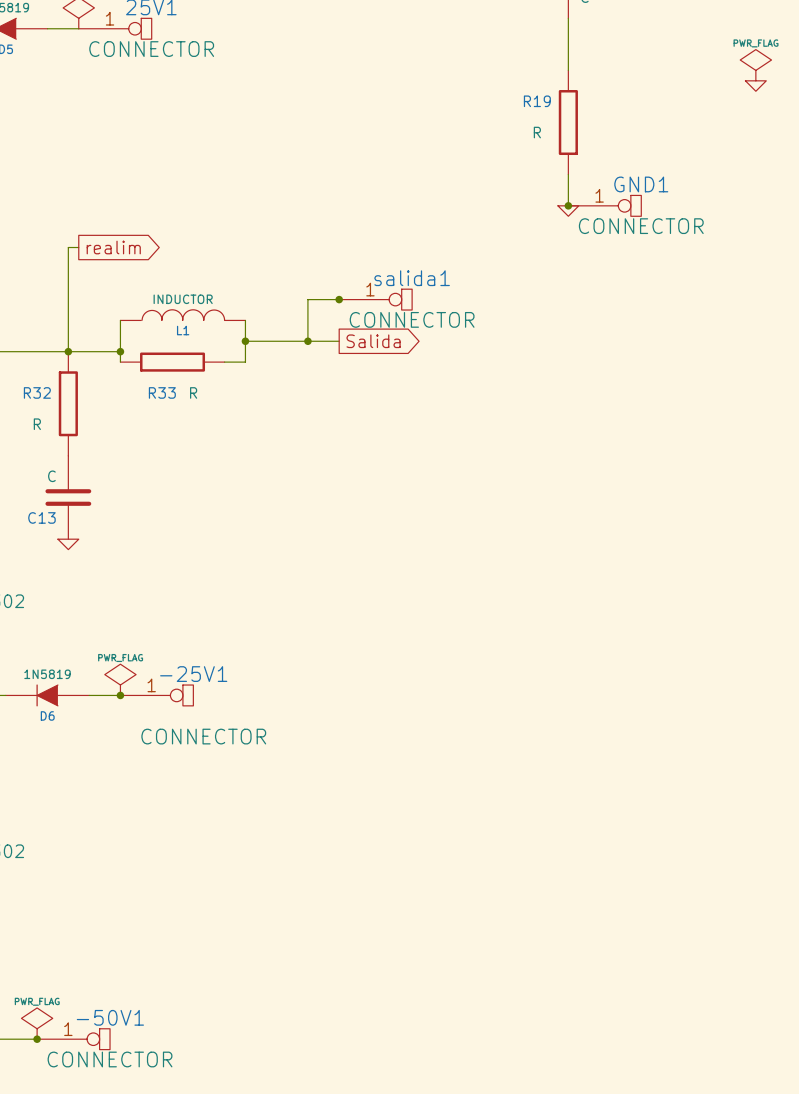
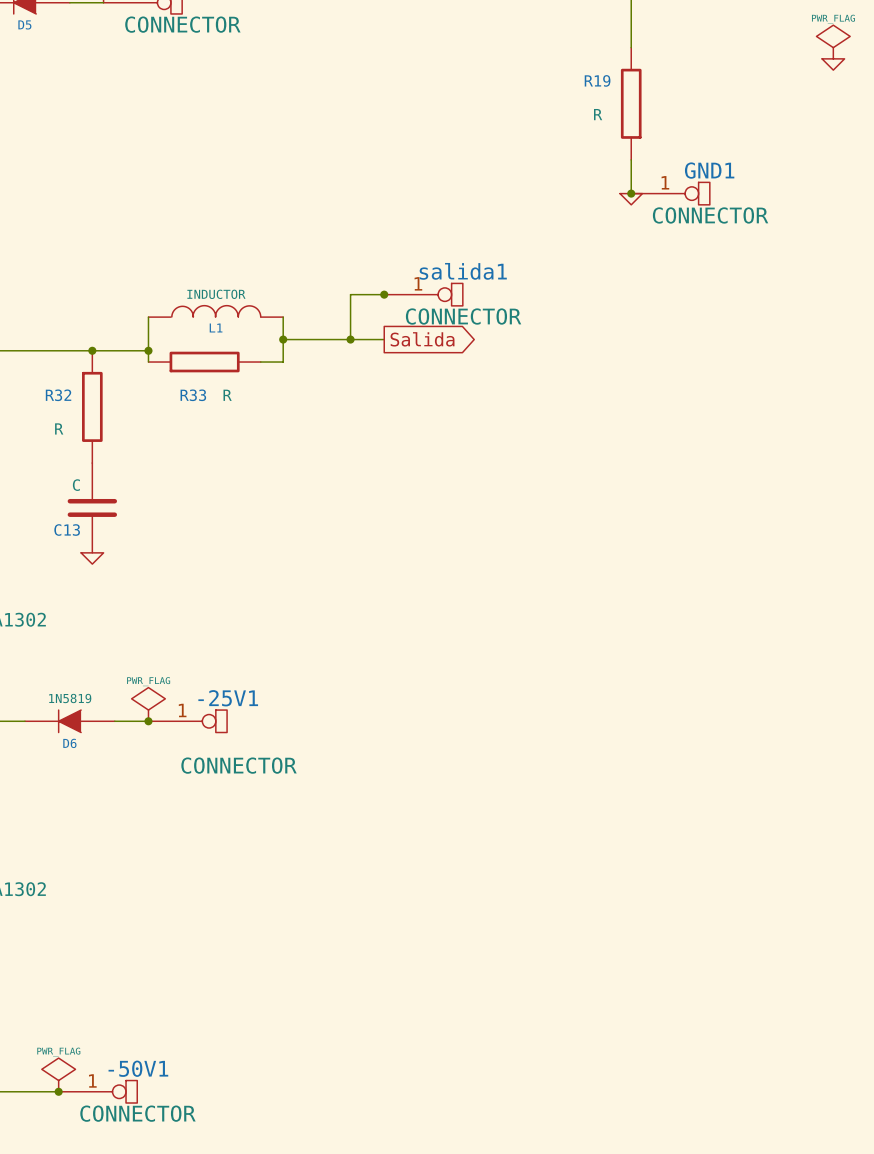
wire: (78, 247) (68, 247) (68, 351) -> none
global label: realim (113, 247) -> none

